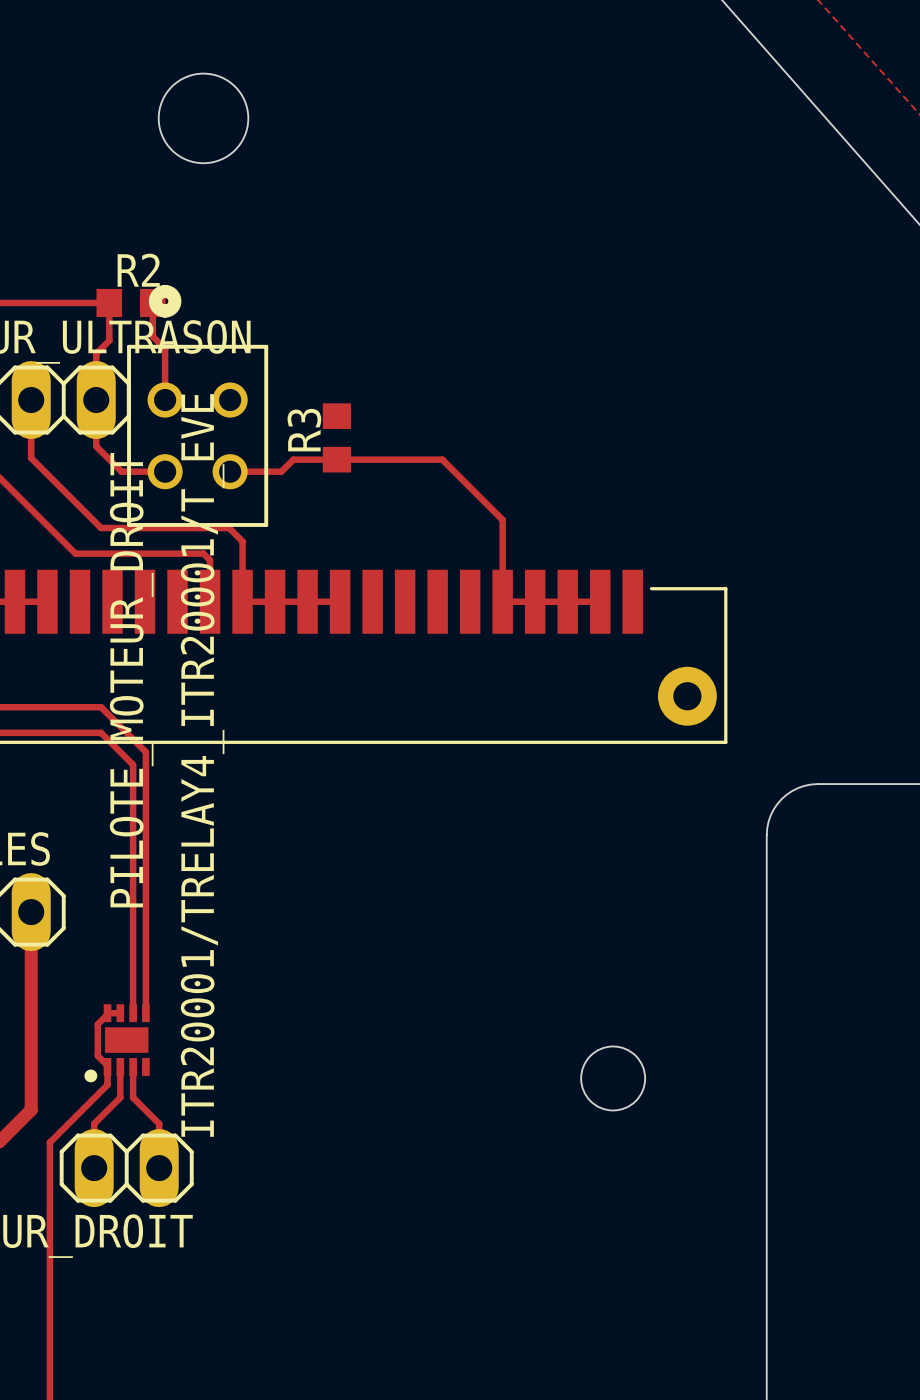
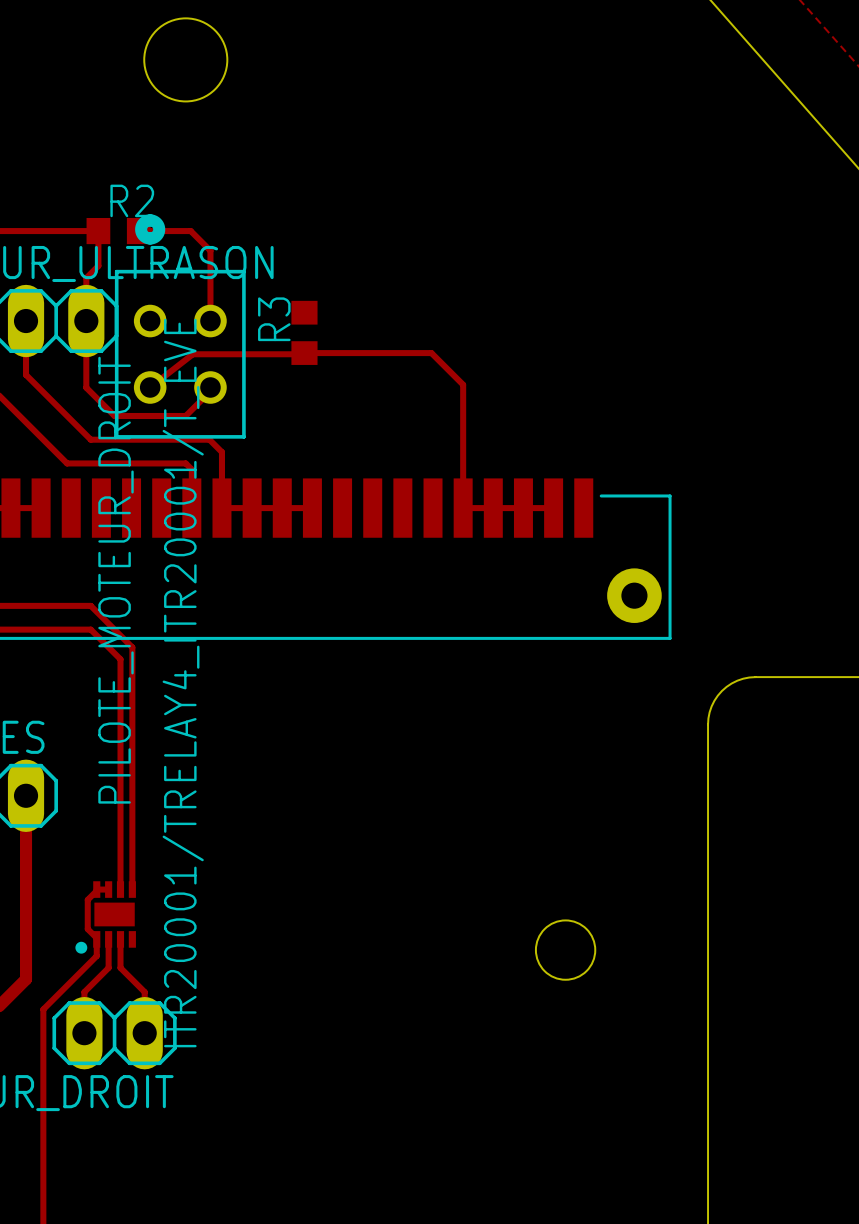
track: (152, 303) (152, 336) (165, 348) (165, 400) -> (138, 231) (190, 231) (210, 250) (210, 321)
R3 position: (336, 437) -> (304, 332)
track: (96, 446) (121, 471) (165, 471) -> (86, 363) (86, 387) (114, 415) (185, 415) (210, 391) (210, 387)
track: (230, 471) (281, 471) (293, 459) (442, 459) (502, 519) -> (150, 387) (192, 354) (431, 353) (463, 384) (463, 432)

